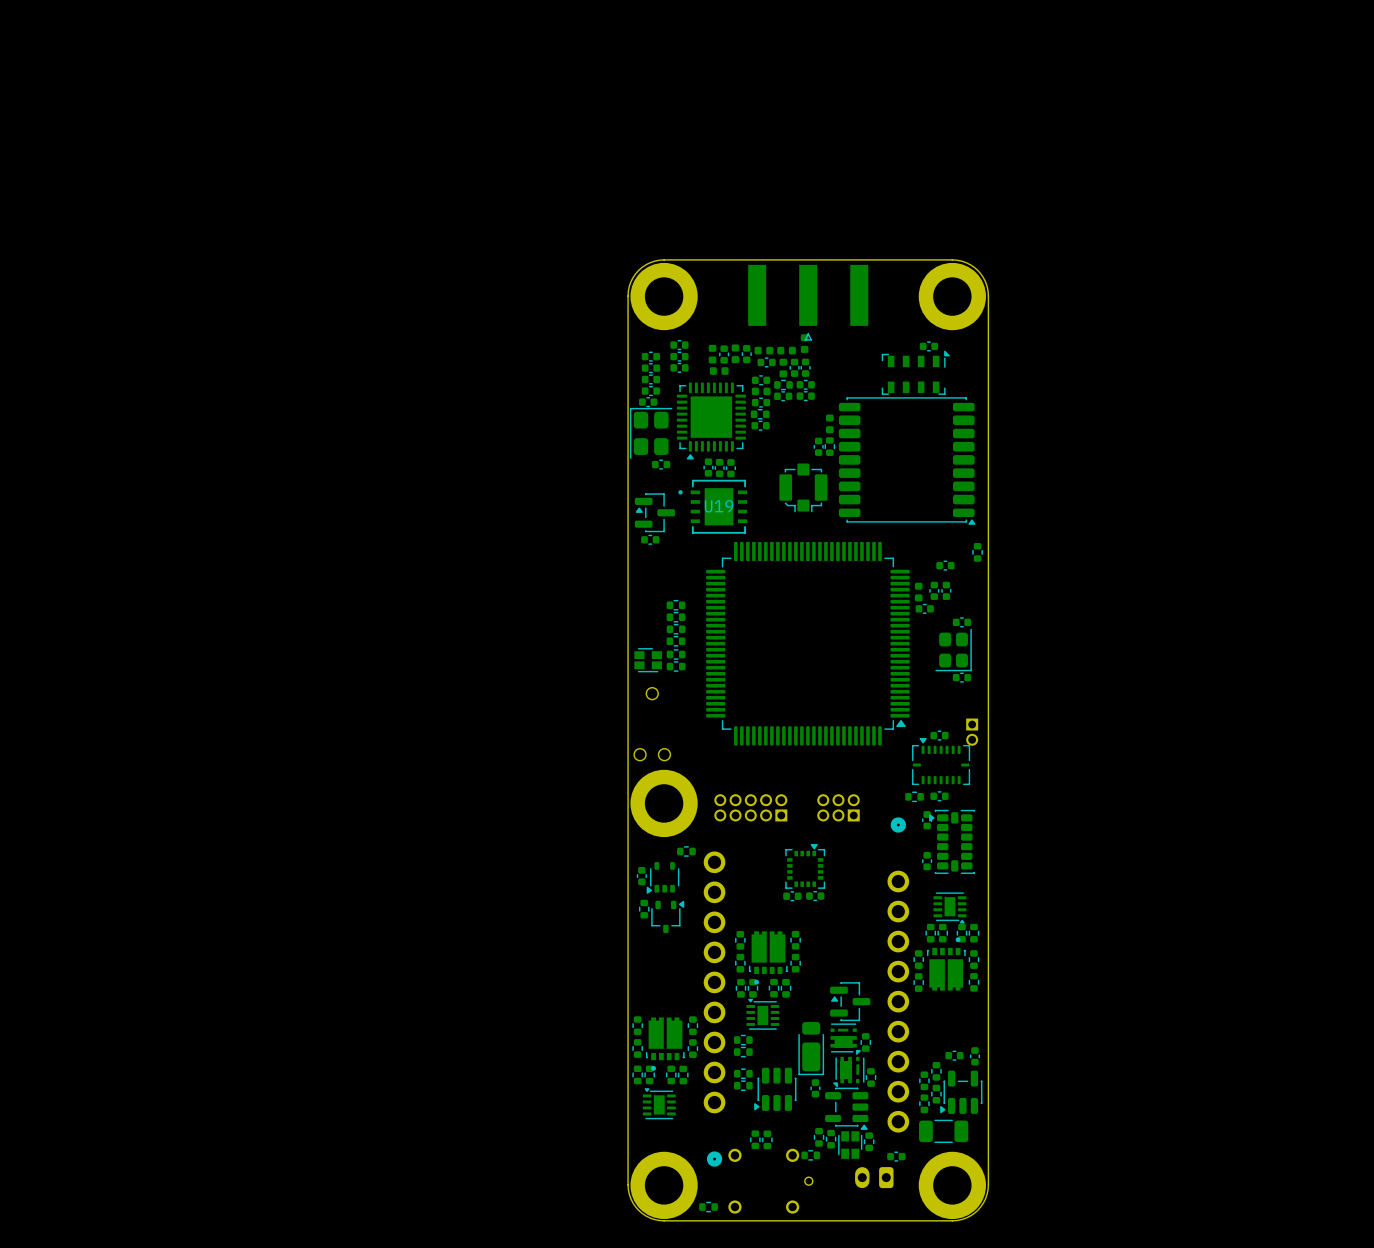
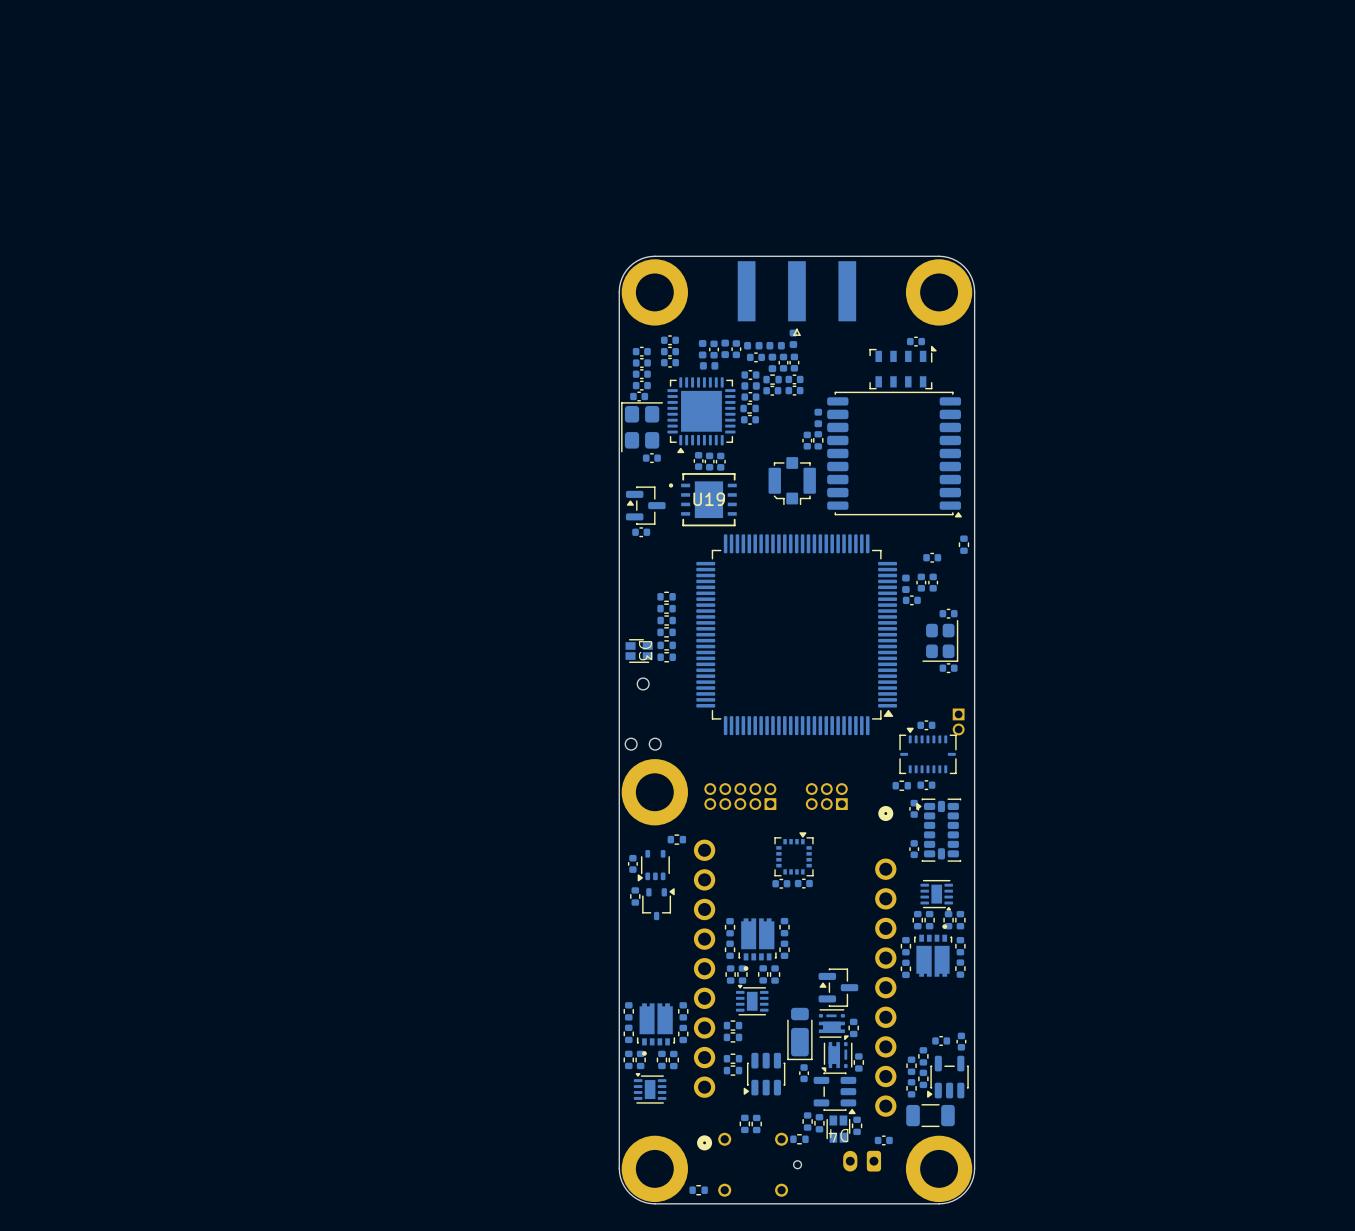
D3 name: none -> D3 (645, 650)
D4 name: none -> D4 (838, 1135)

